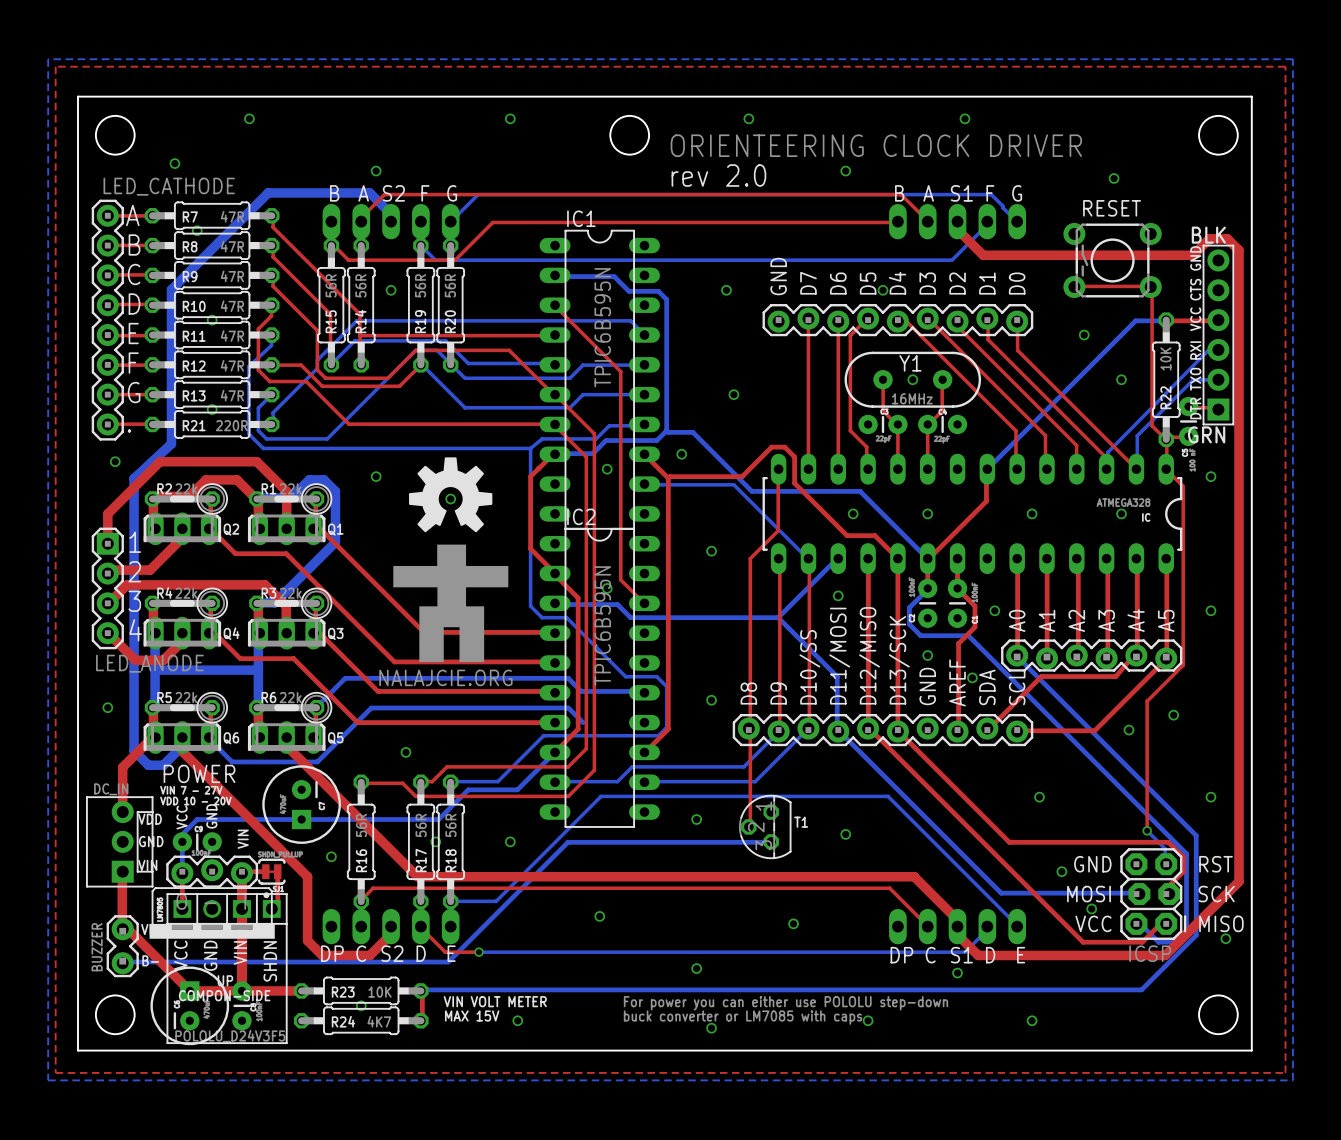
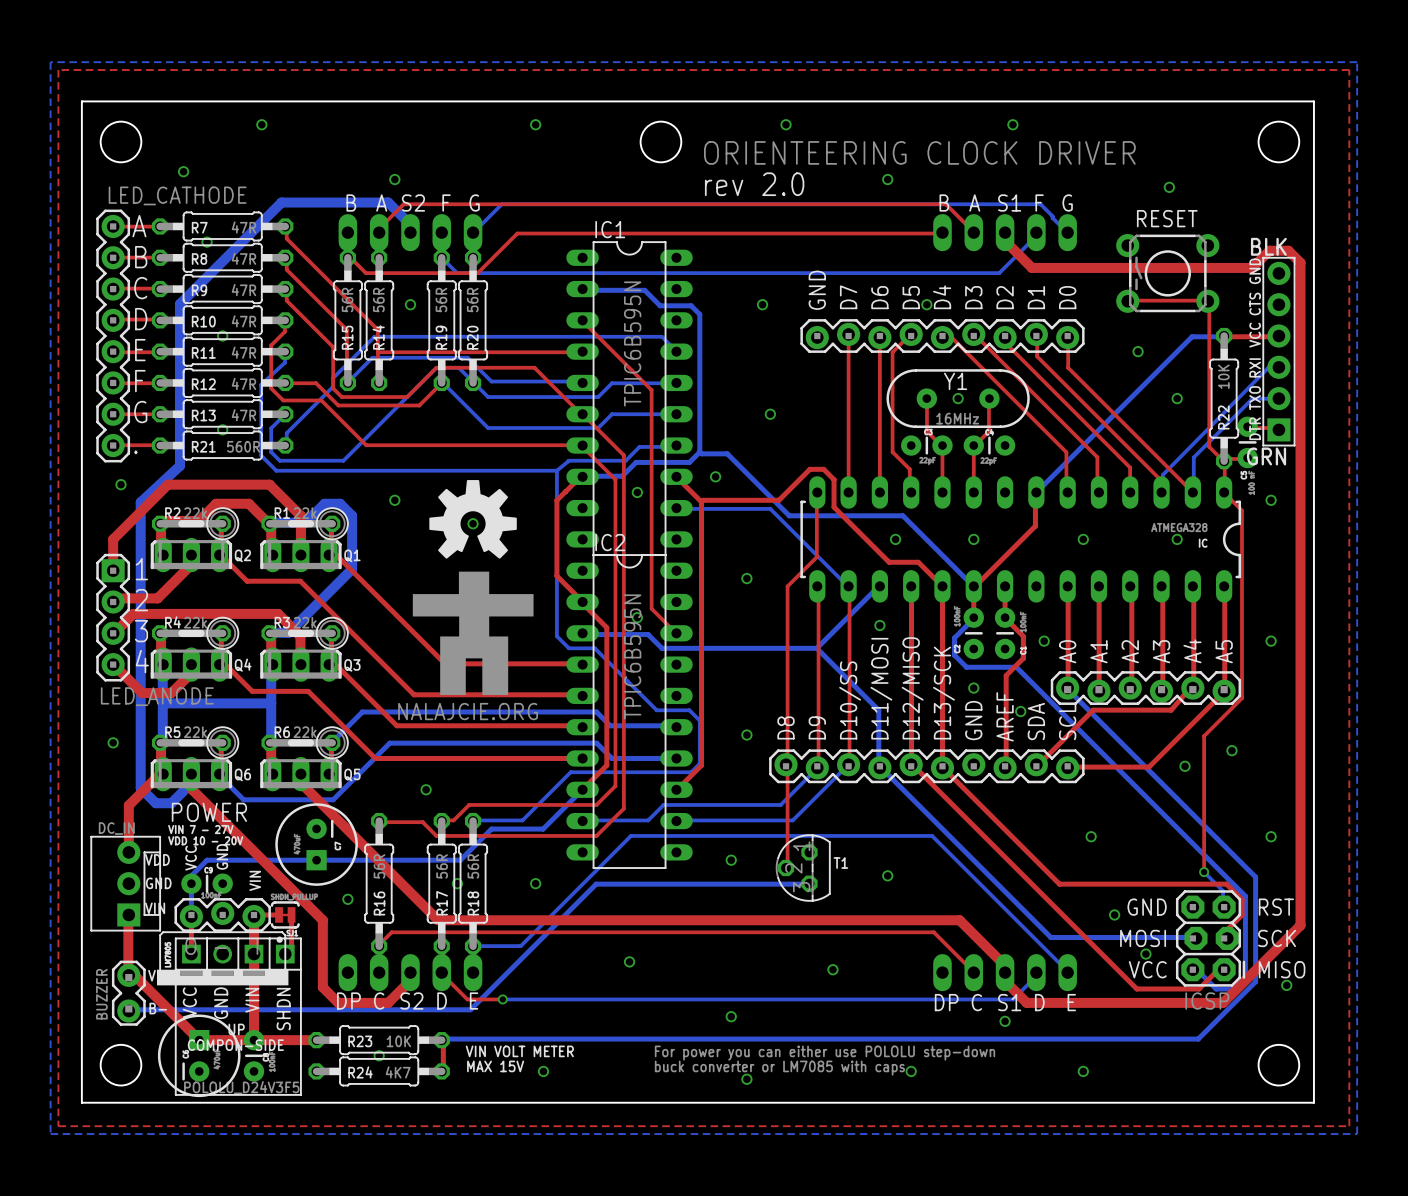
R21 value: 220R (231, 425) -> 560R (243, 446)
bottom track: none -> (612, 758) (676, 758)

